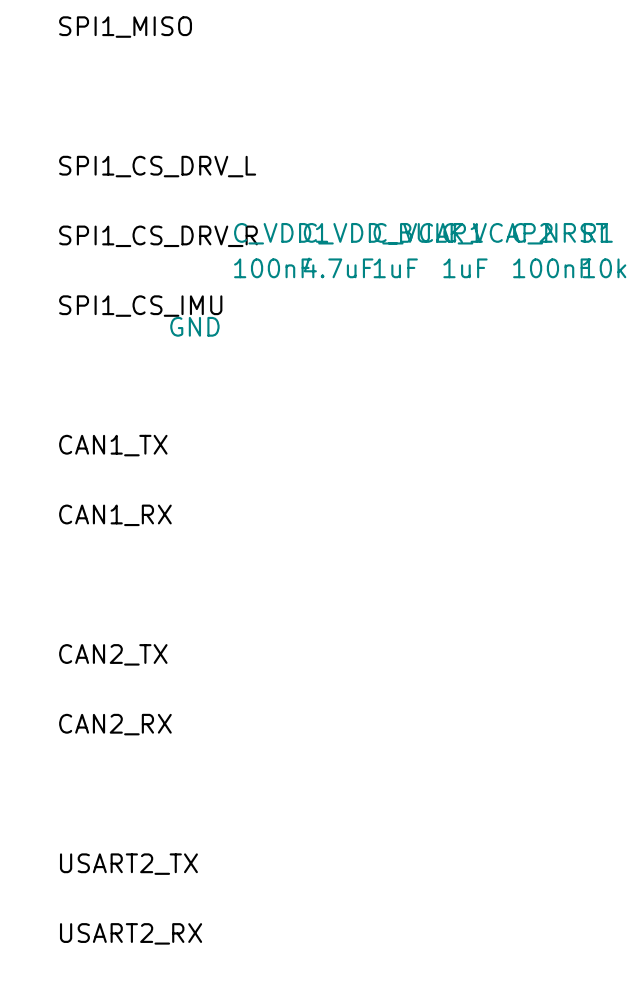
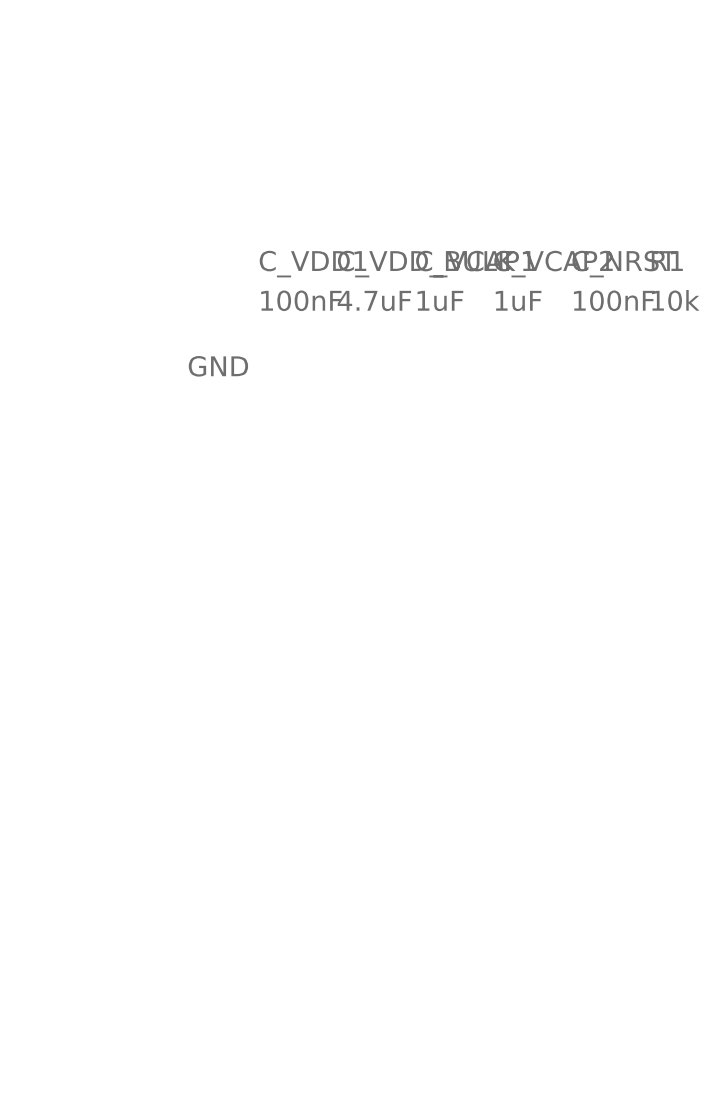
label: SPI1_MISO (125, 27) -> none
label: SPI1_CS_DRV_L (157, 166) -> none
label: SPI1_CS_DRV_R (158, 236) -> none
label: SPI1_CS_IMU (140, 306) -> none
label: CAN1_TX (113, 445) -> none
label: CAN1_RX (115, 515) -> none
label: CAN2_TX (113, 654) -> none
label: CAN2_RX (115, 724) -> none
label: USART2_TX (128, 864) -> none
label: USART2_RX (131, 933) -> none

